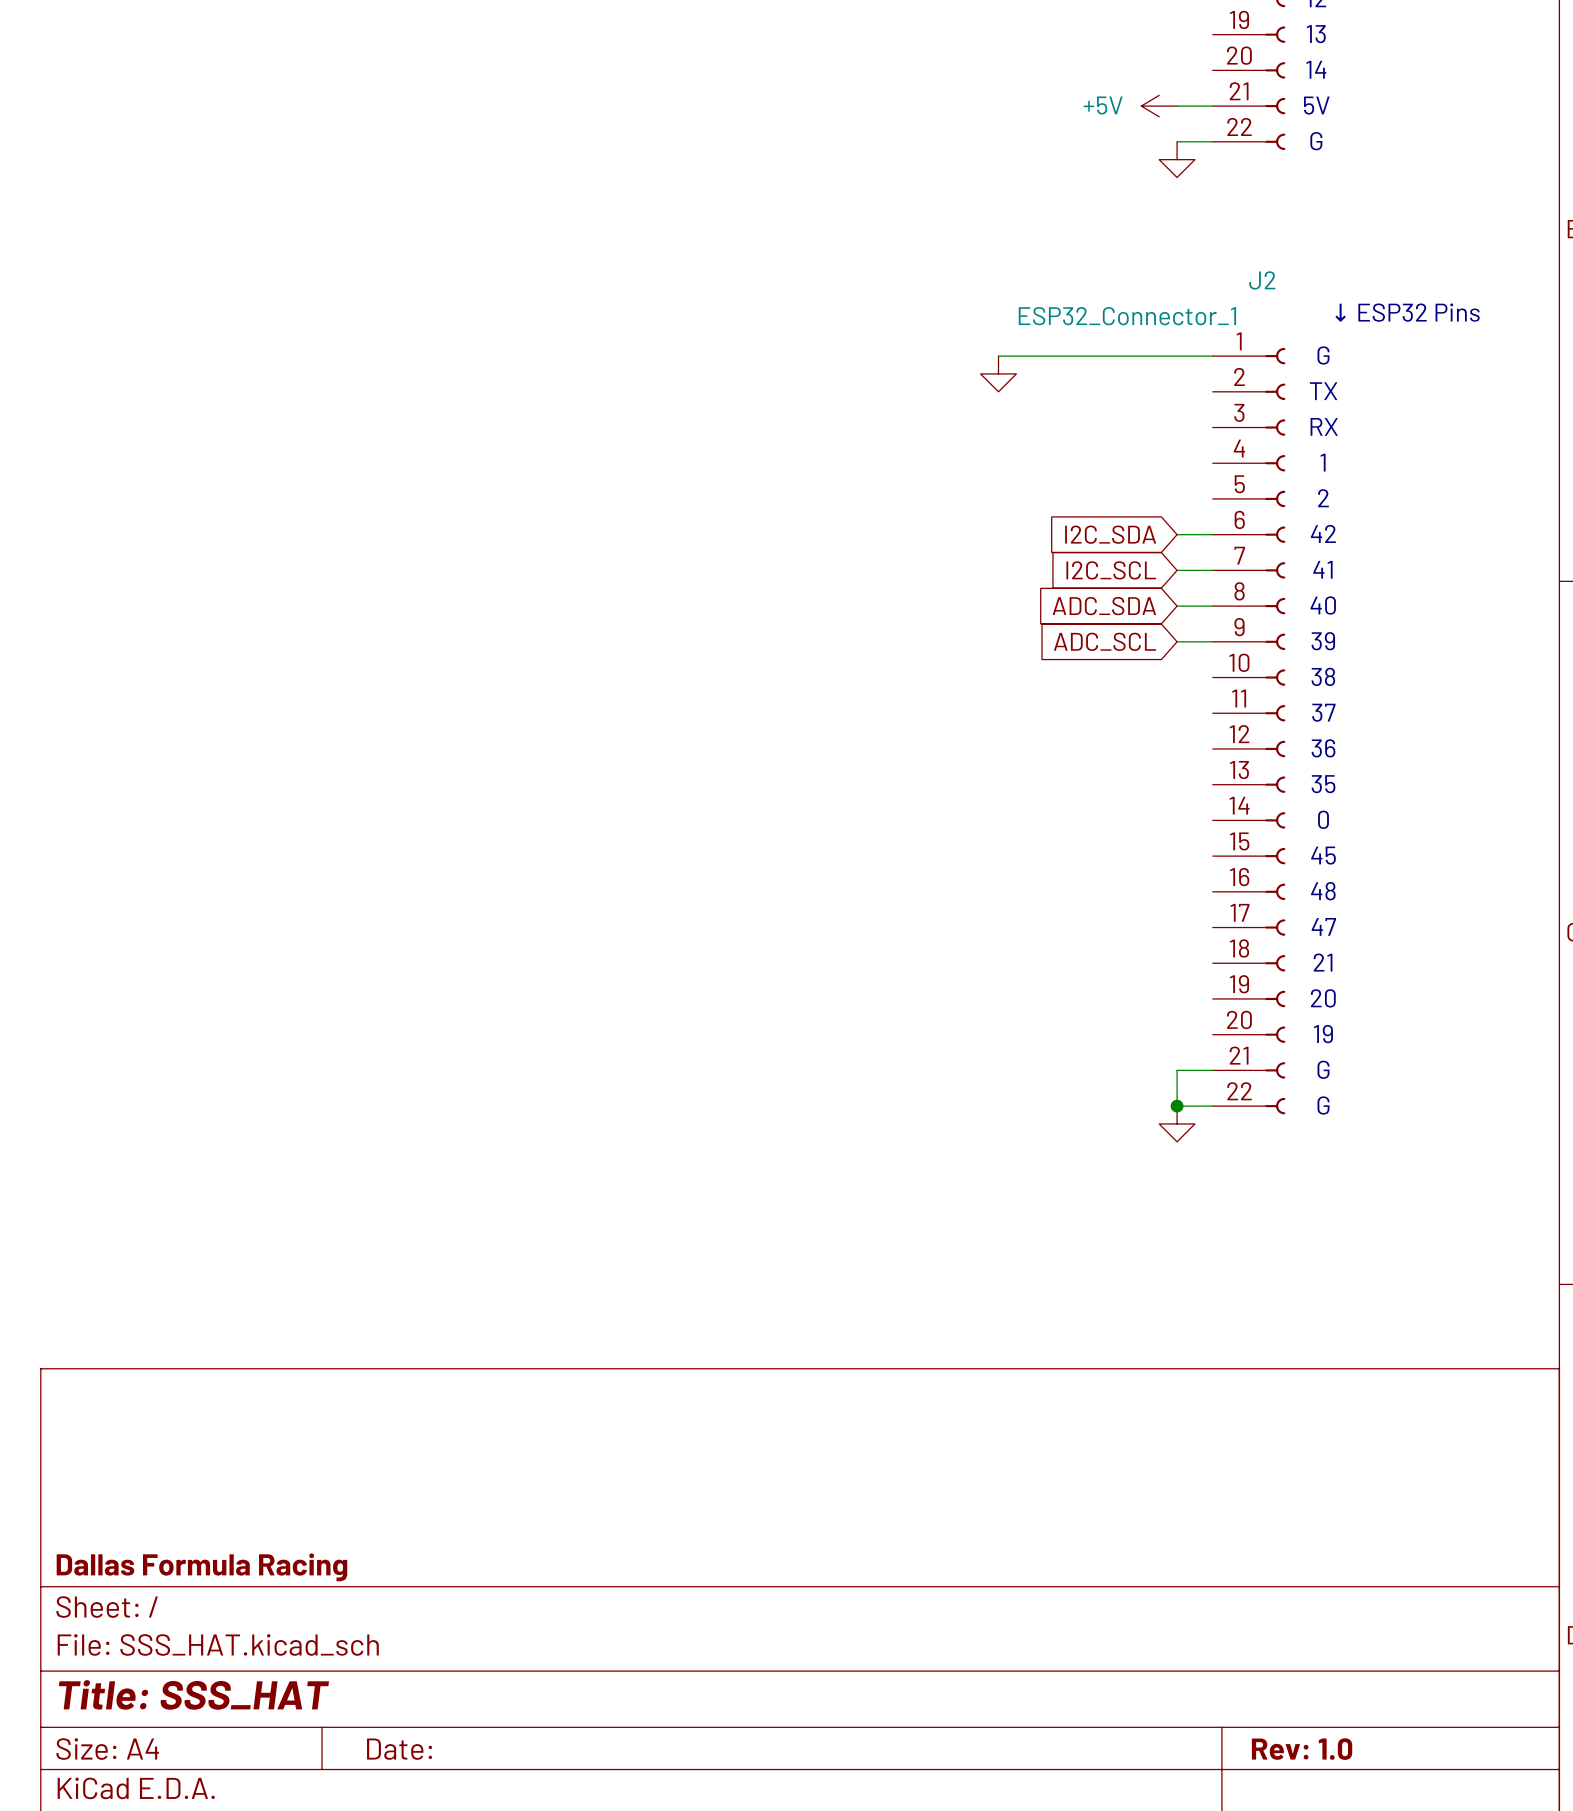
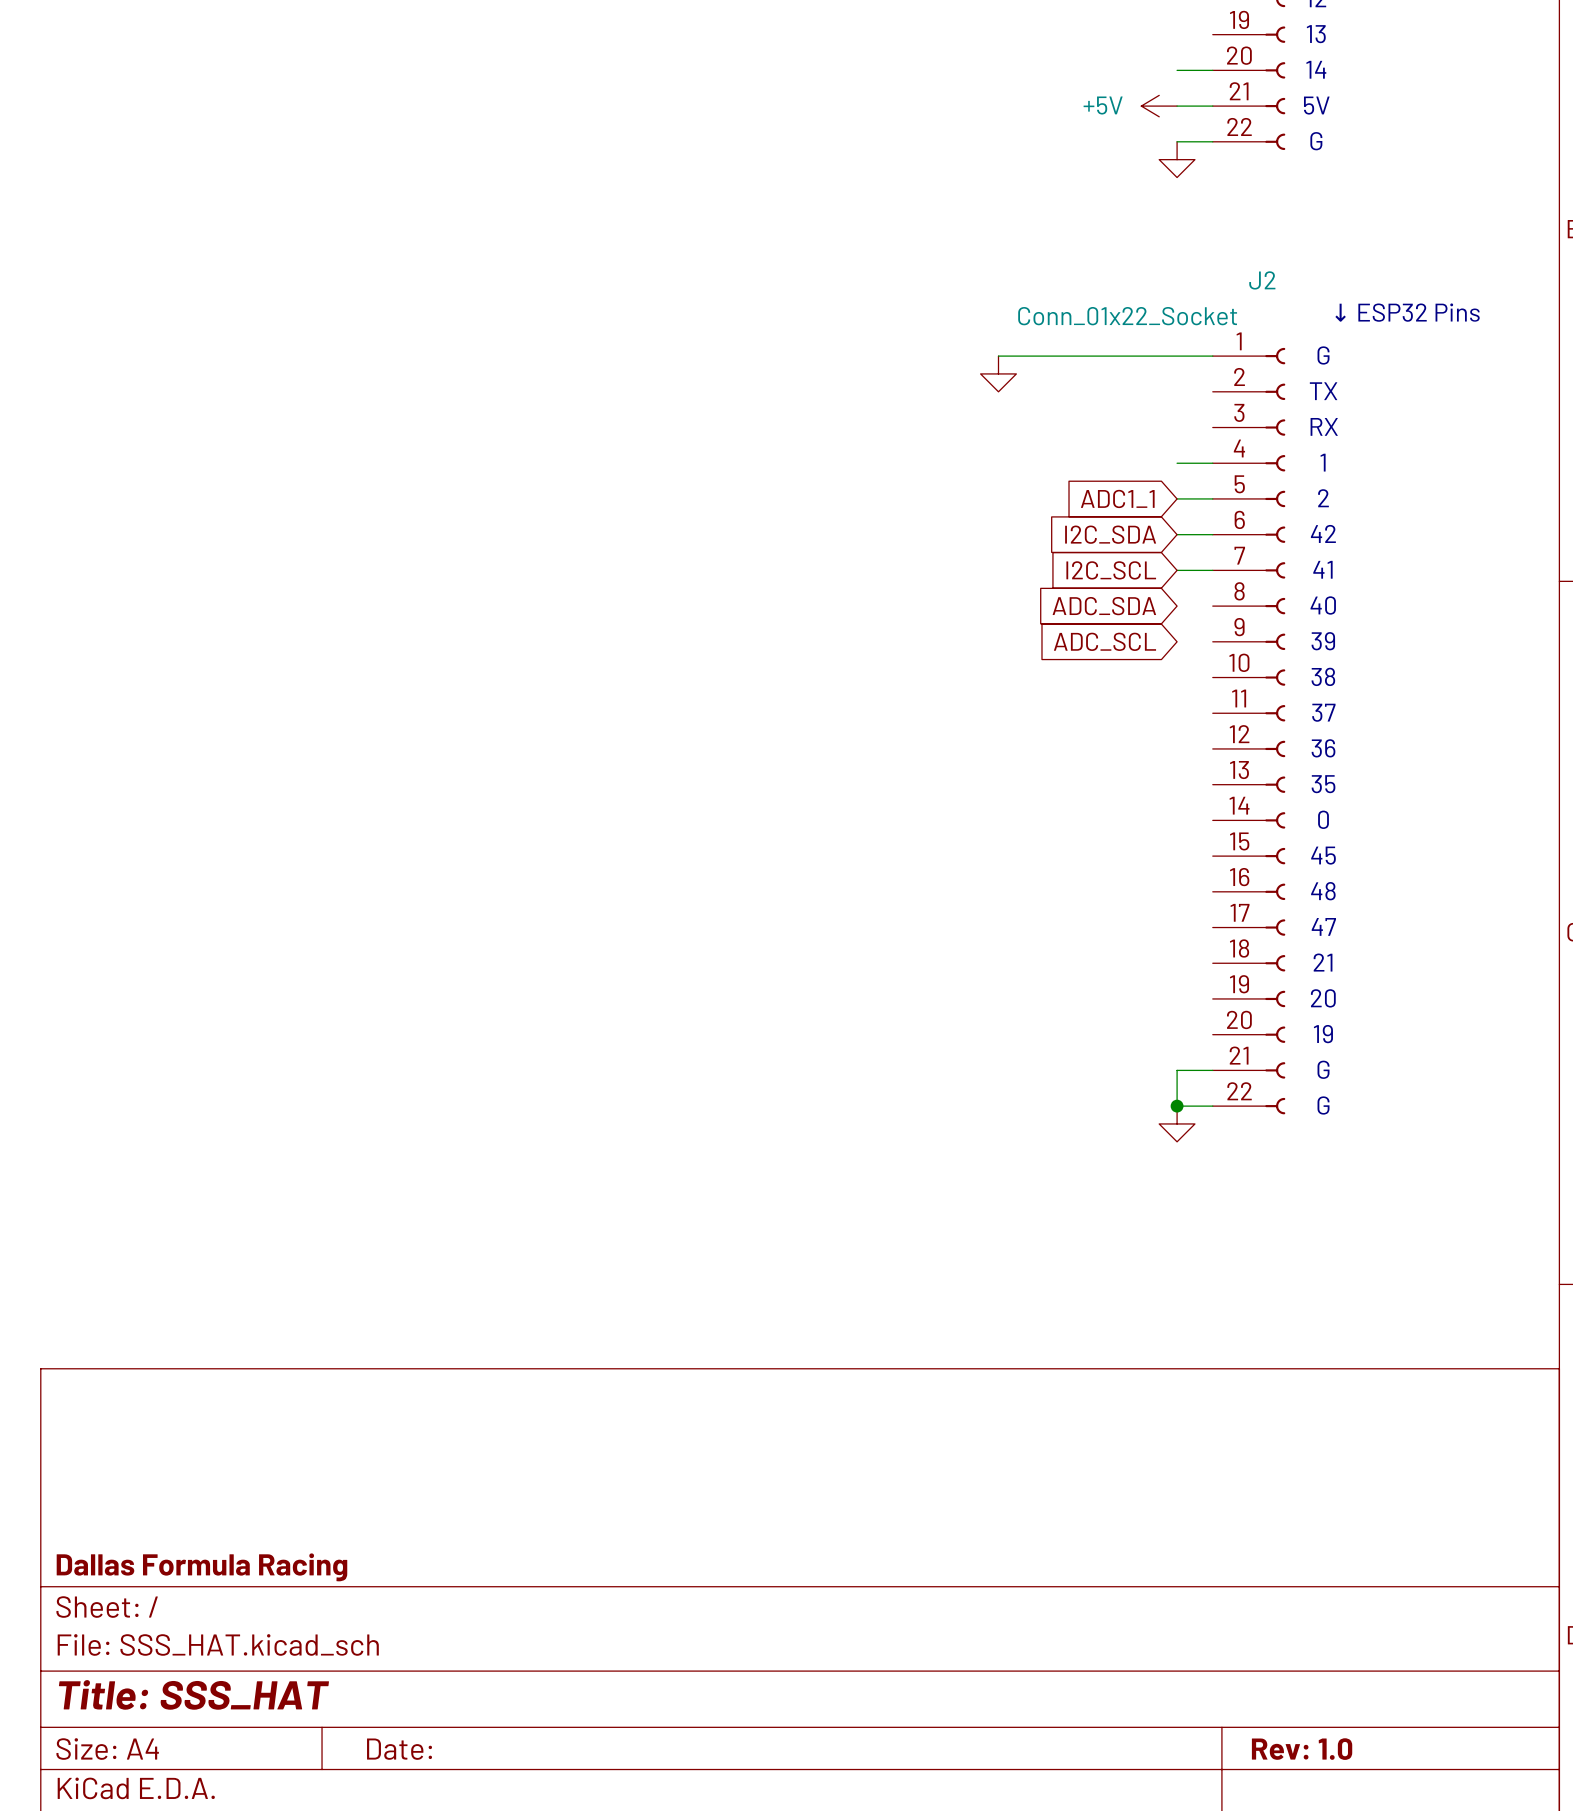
wire: none -> (1177, 70) (1212, 70)
J2 value: ESP32_Connector_1 (1127, 316) -> Conn_01x22_Socket (1127, 316)
global label: none -> ADC1_1 (1117, 498)
wire: (1177, 606) (1212, 606) -> (1177, 463) (1212, 463)
wire: (1177, 641) (1212, 641) -> (1177, 498) (1212, 498)

